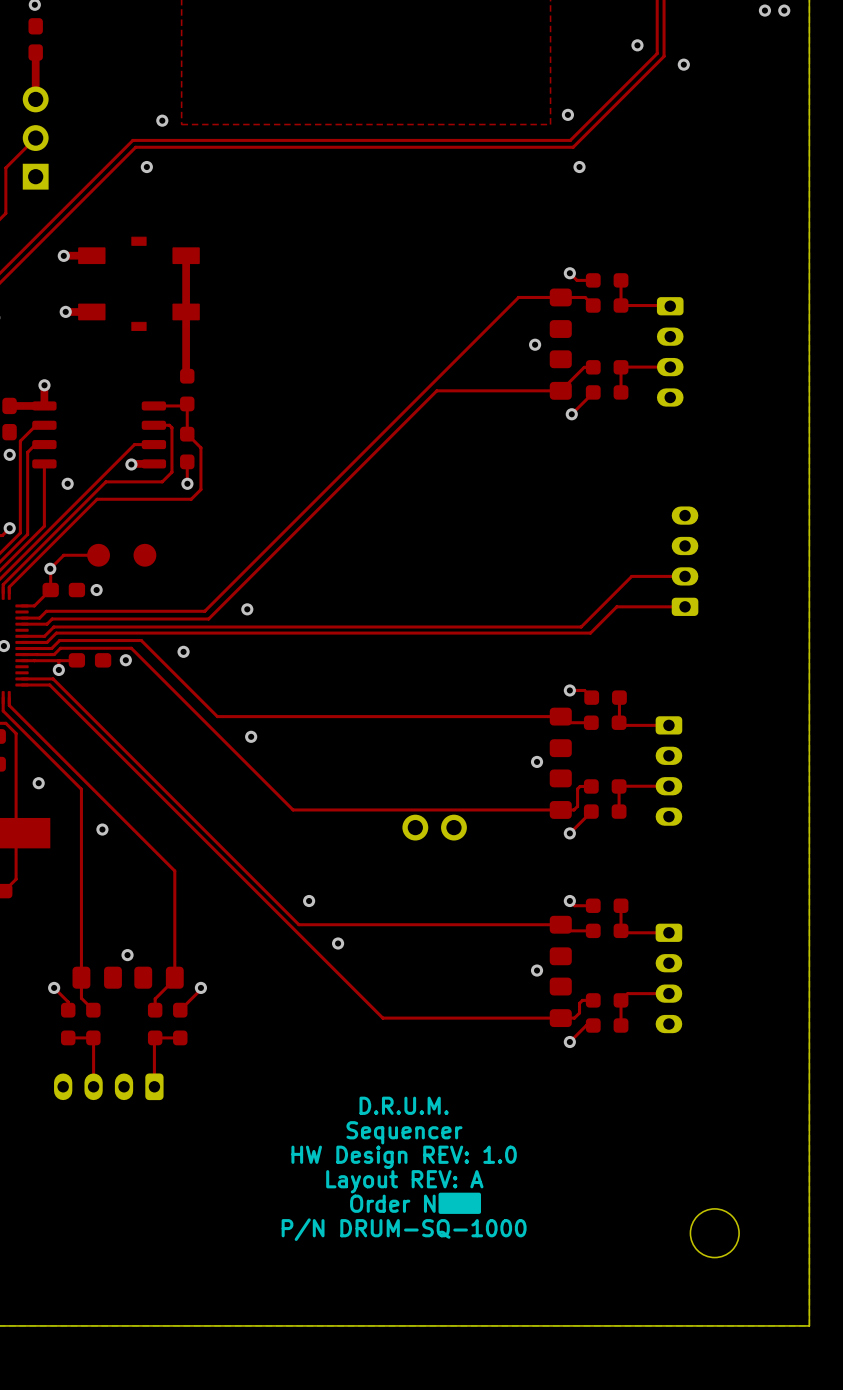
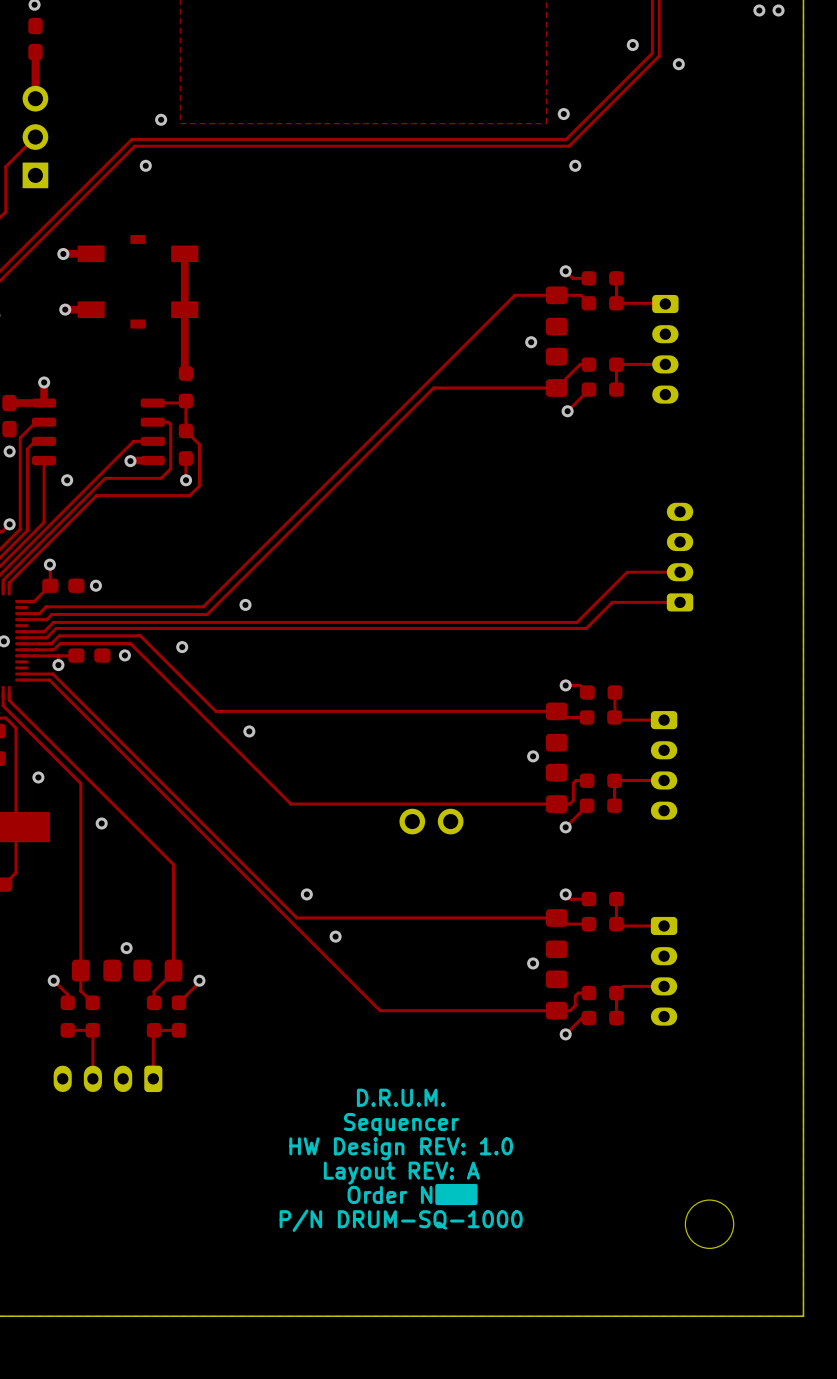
top track: (98, 555) (63, 555) (50, 568) -> none
part: (98, 555) -> none
part: (144, 555) -> none

